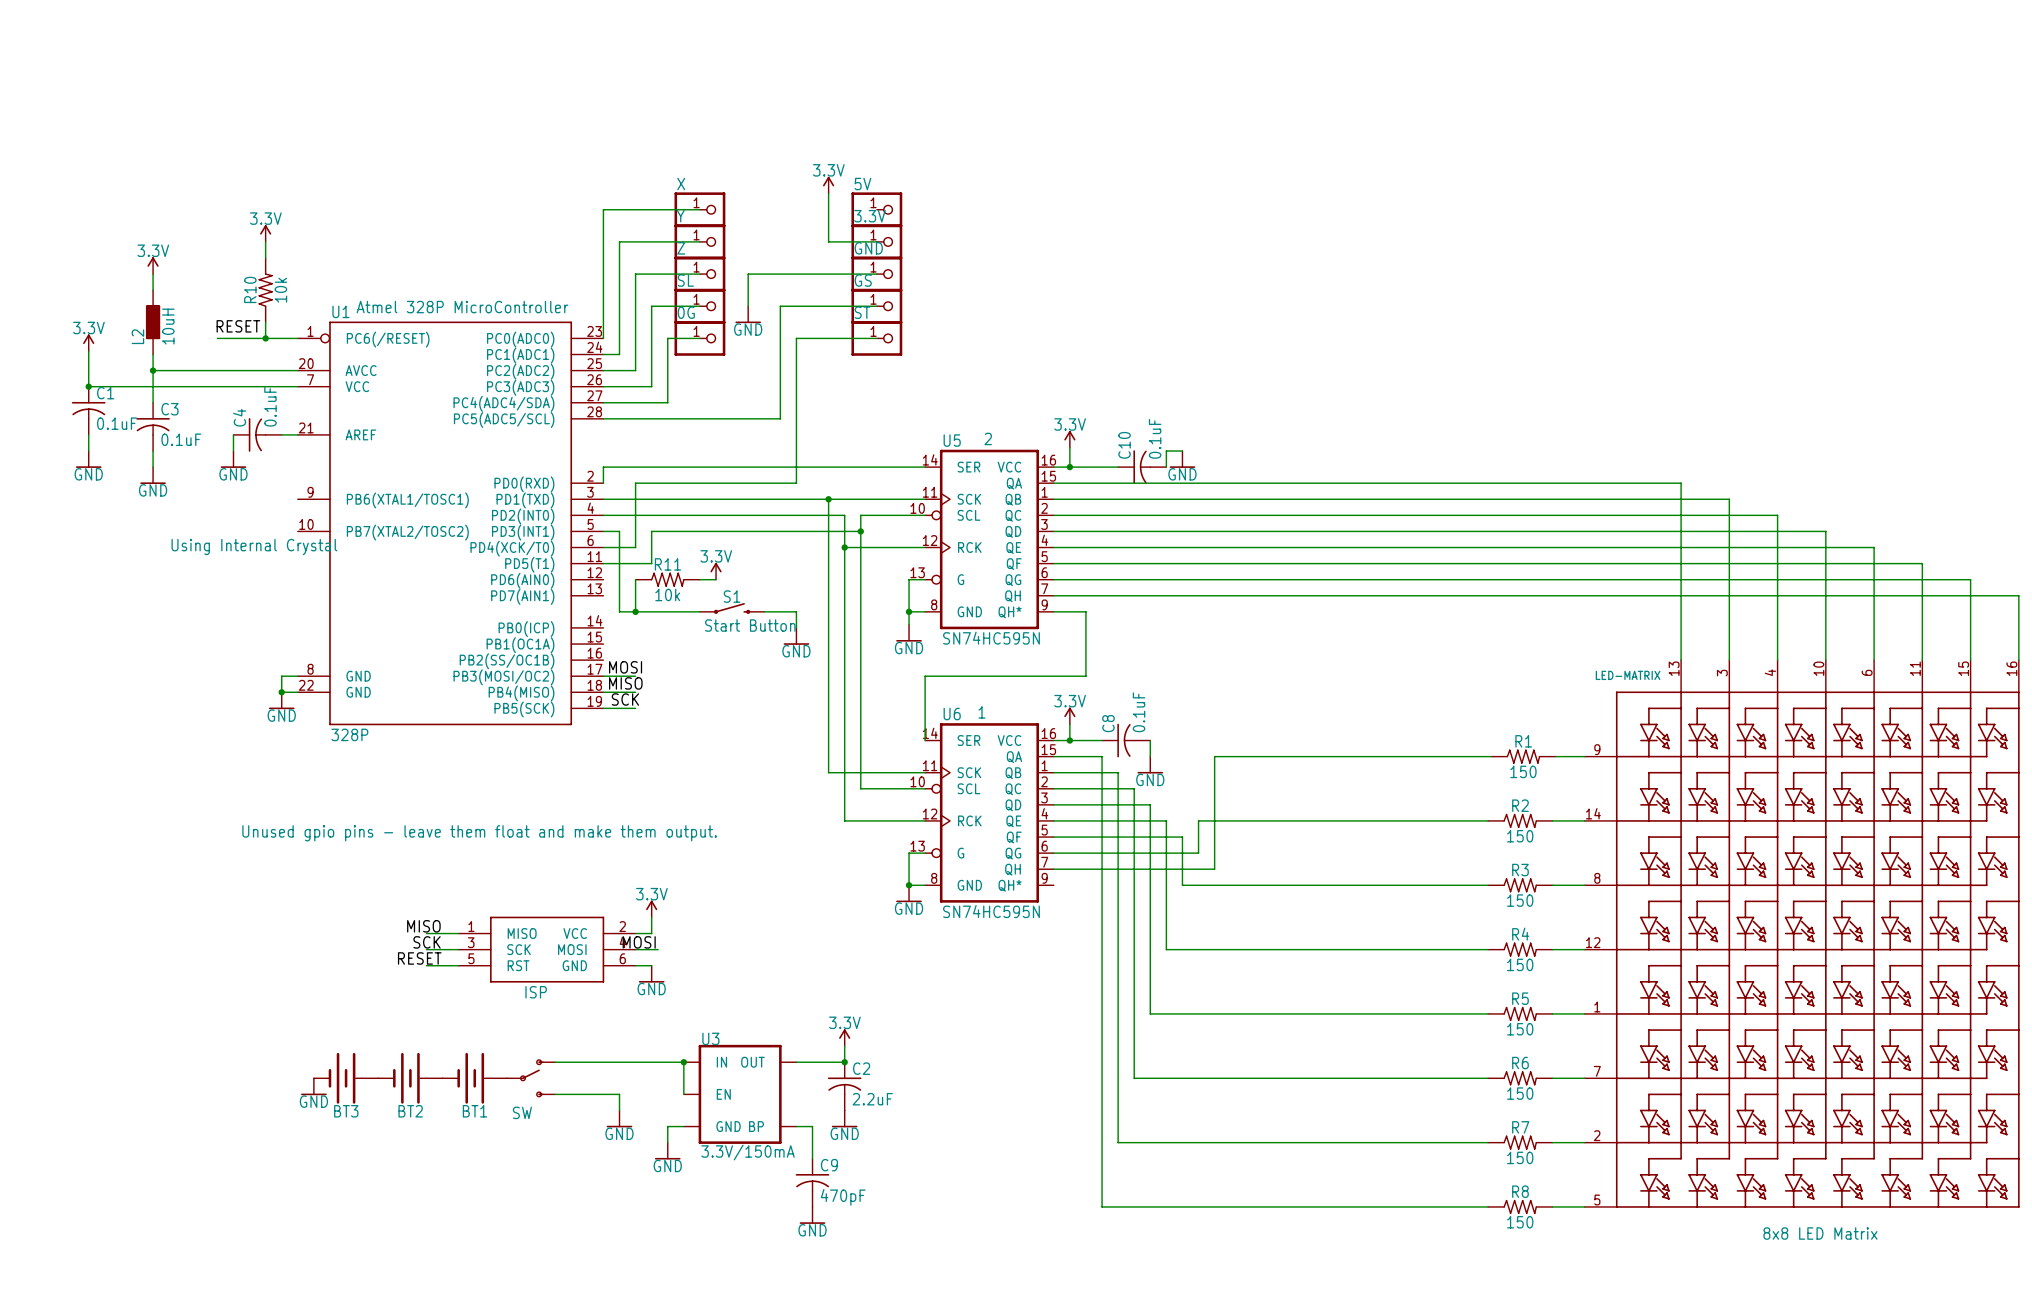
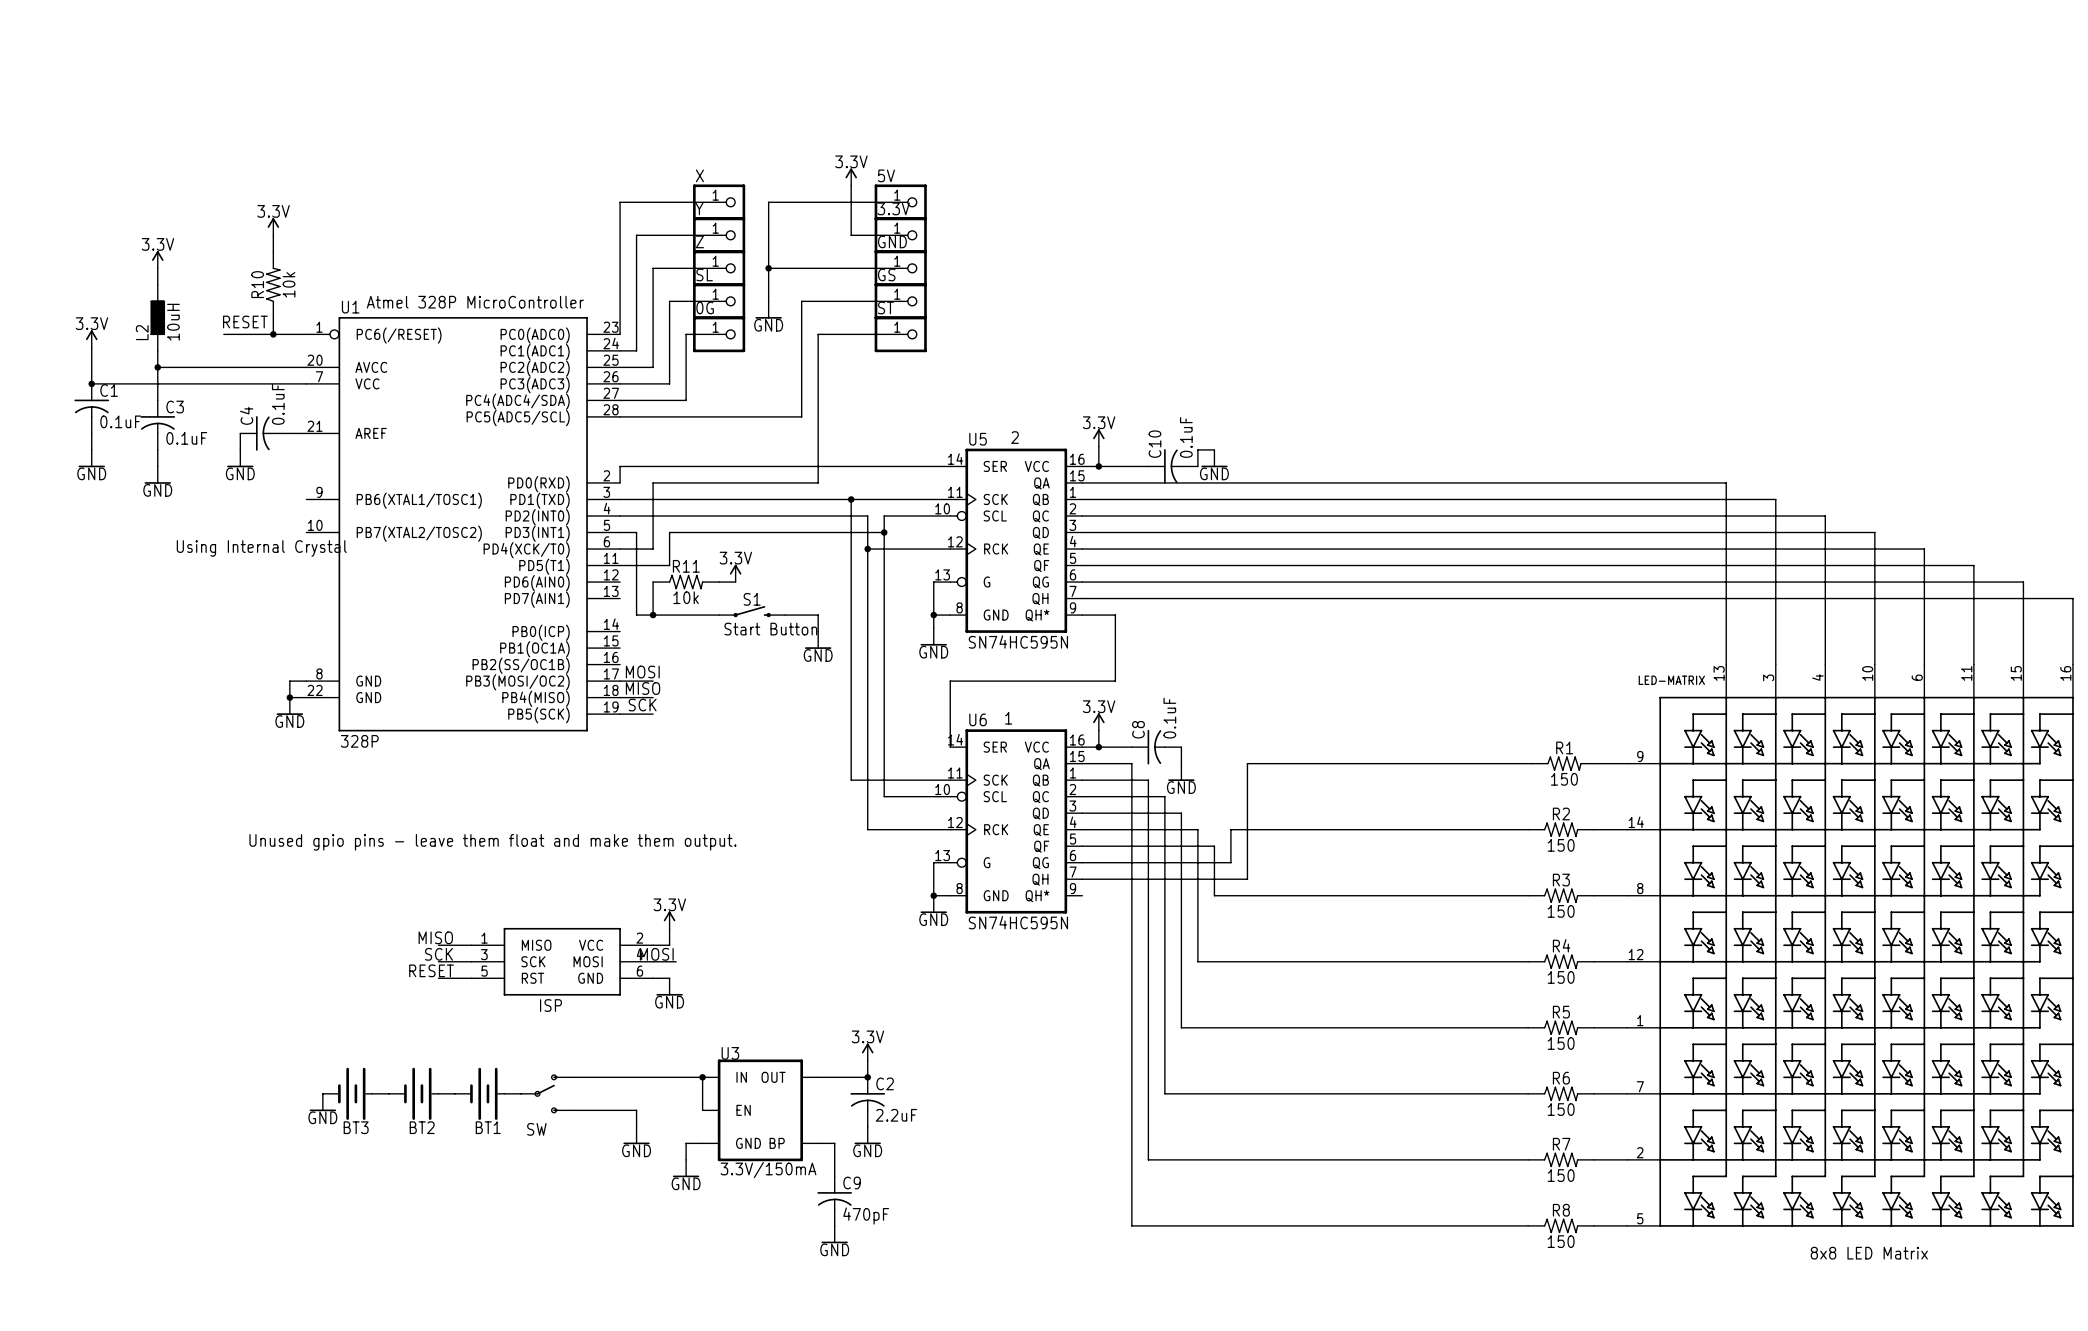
wire: none -> (900, 202) (768, 202) (768, 268)
junction: none -> (768, 268)

